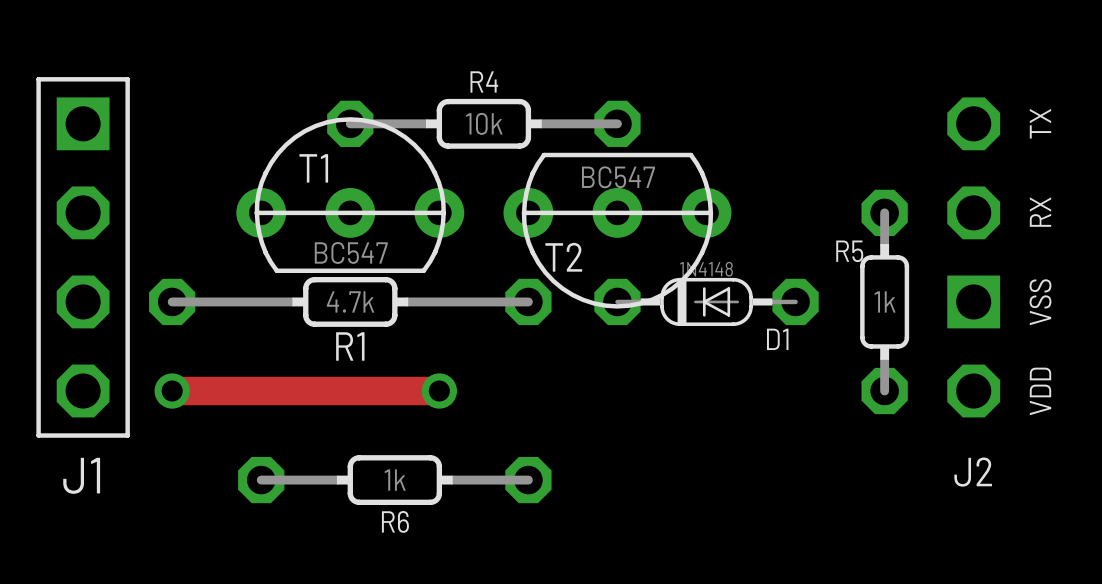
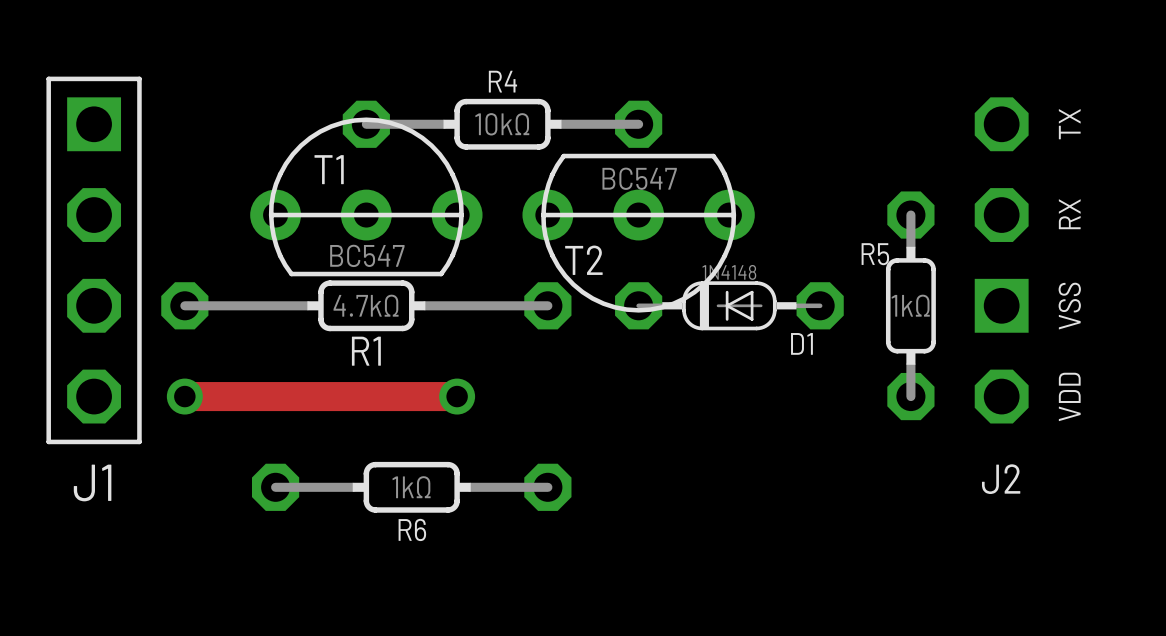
R4 value: 10k (484, 123) -> 10kΩ (502, 124)
R1 value: 4.7k (350, 301) -> 4.7kΩ (366, 305)
R5 value: 1k (885, 301) -> 1kΩ (910, 305)
R6 value: 1k (395, 480) -> 1kΩ (411, 487)

